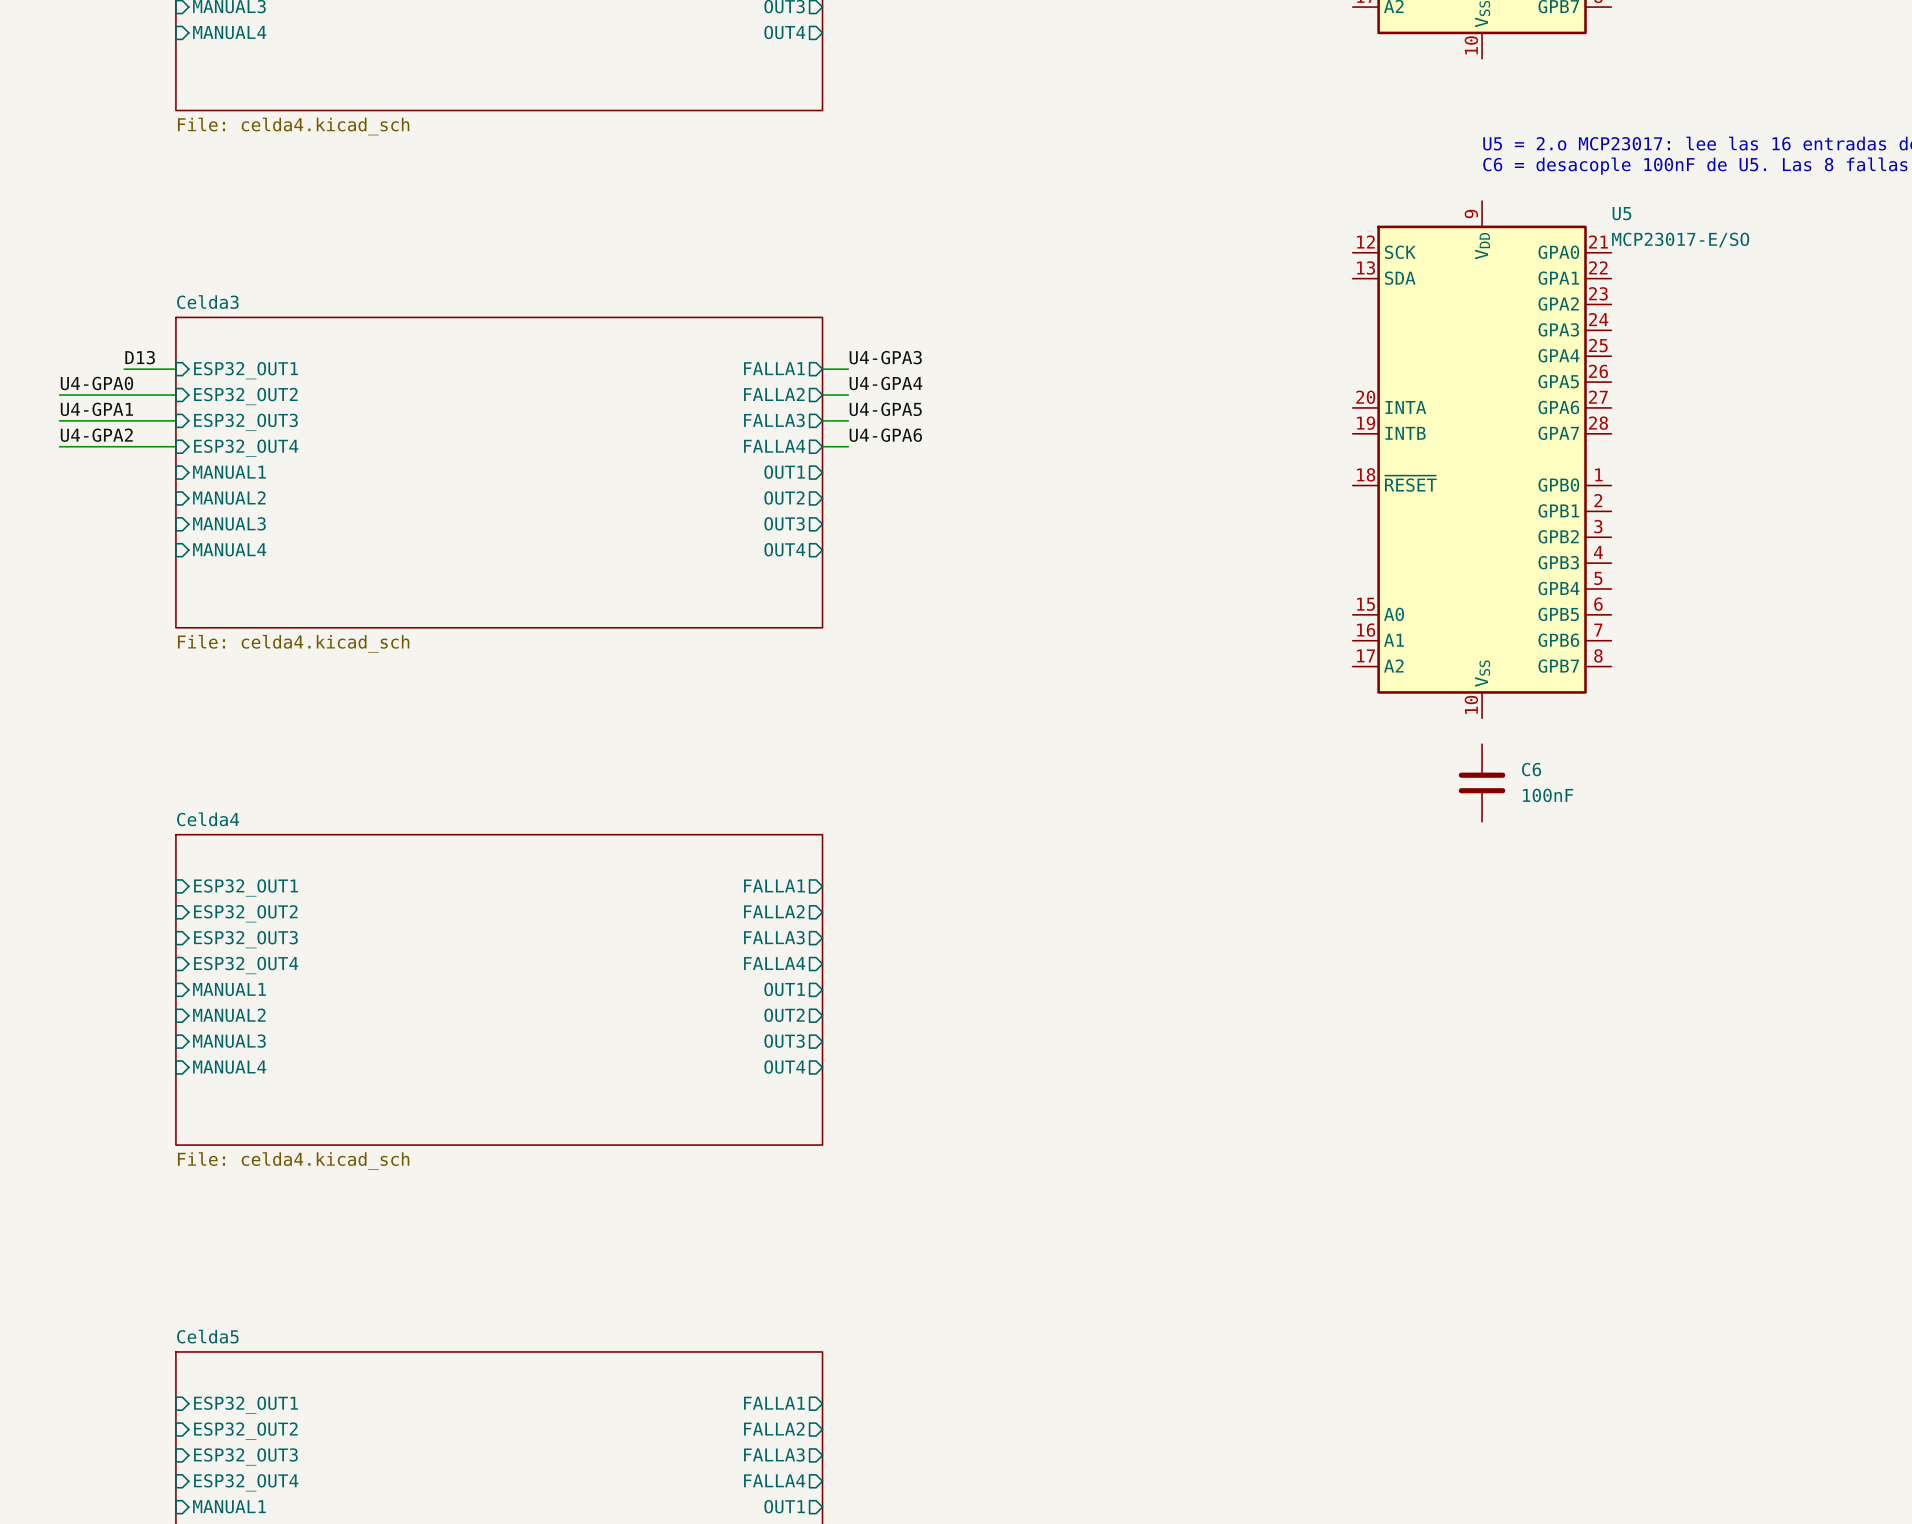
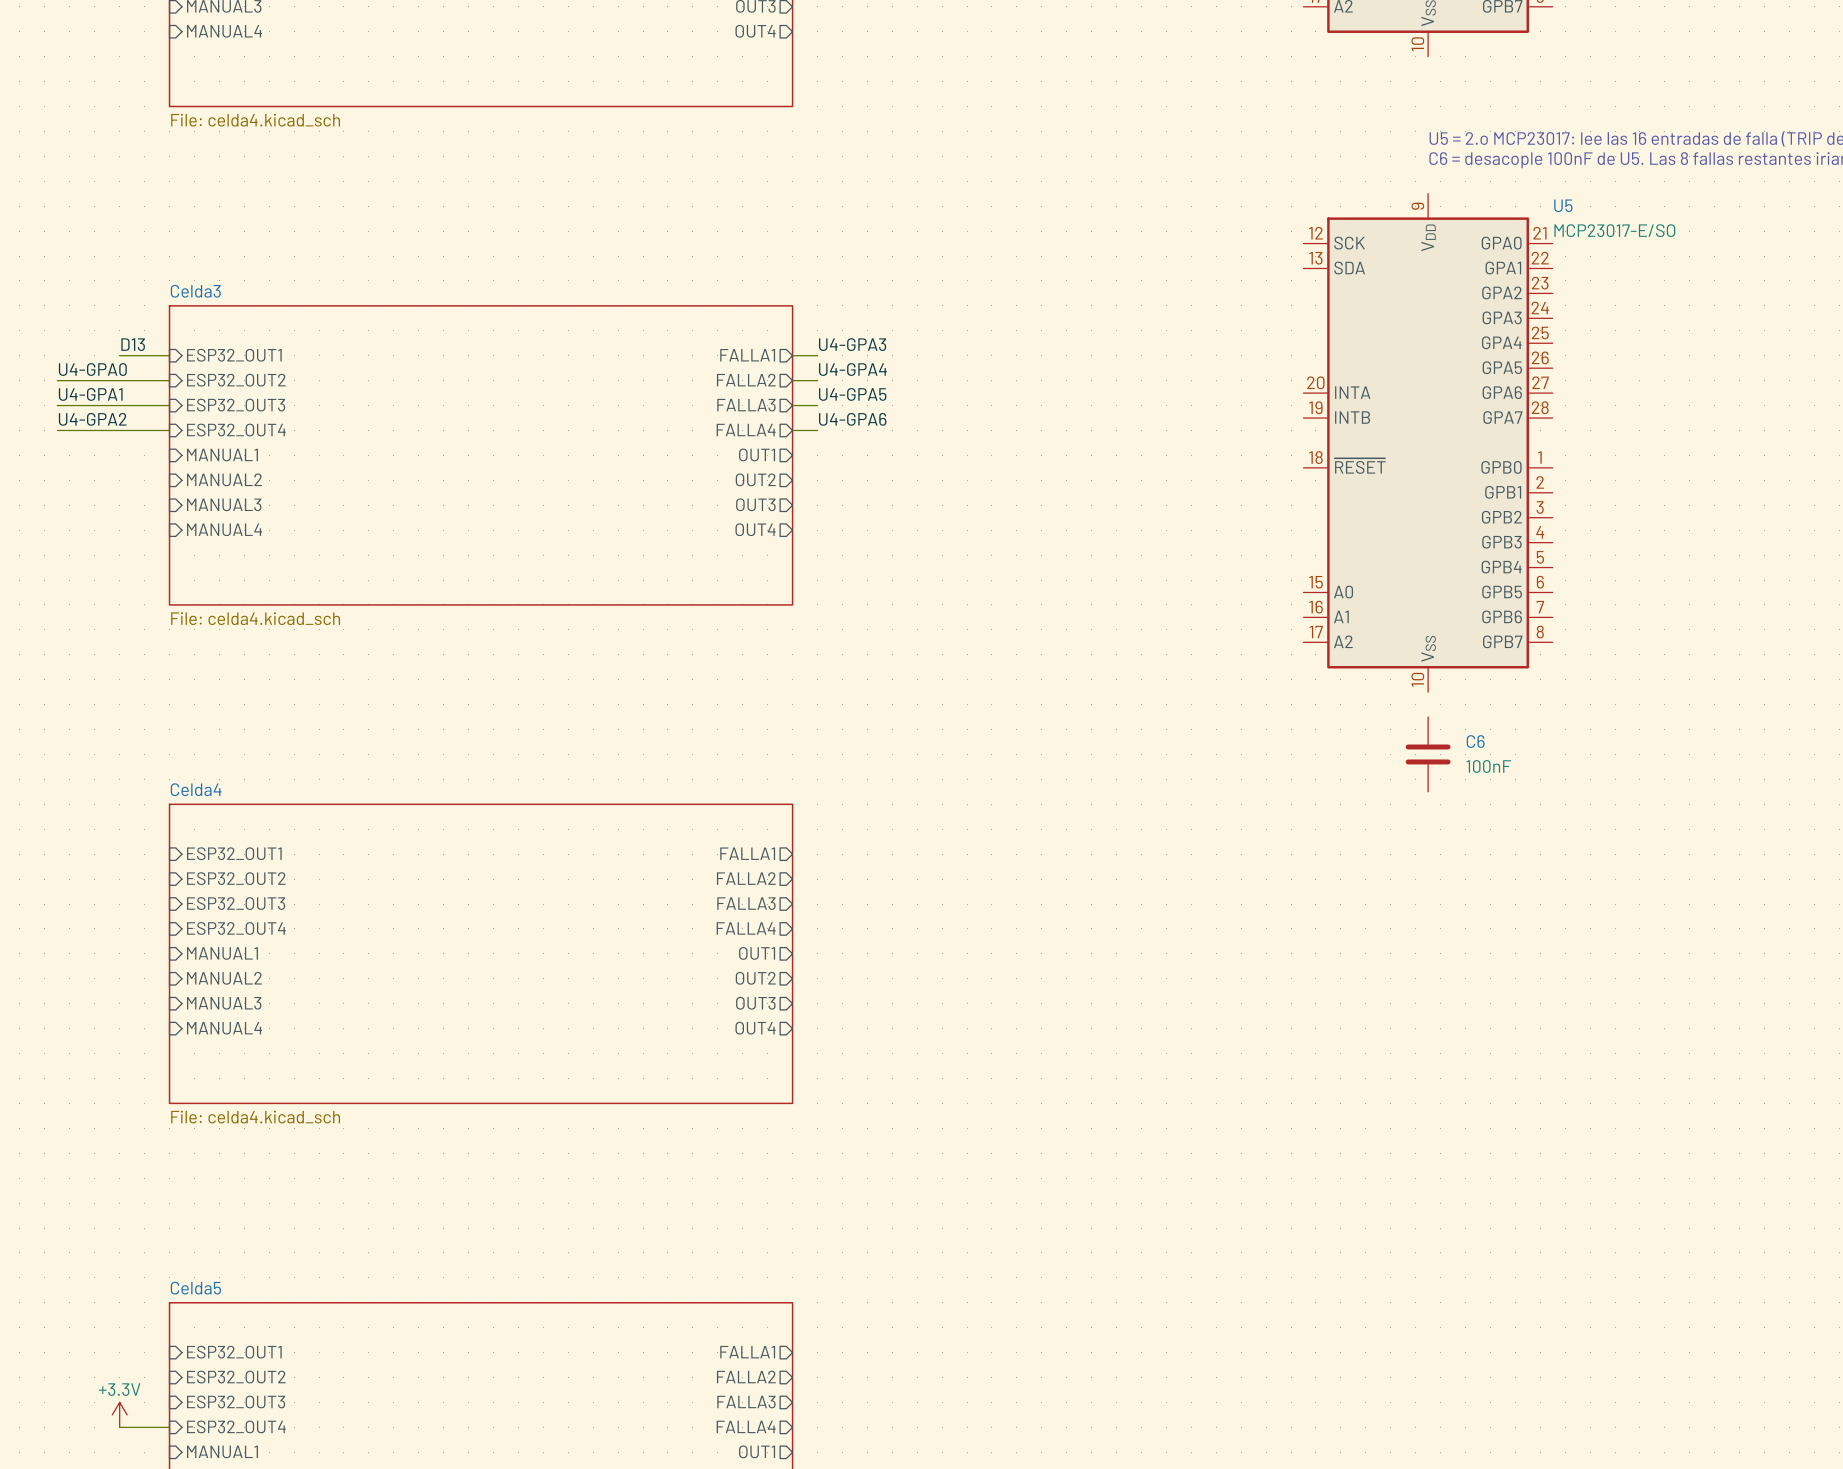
power symbol: none -> +3.3V (119, 1414)
wire: none -> (119, 1427) (169, 1427)

